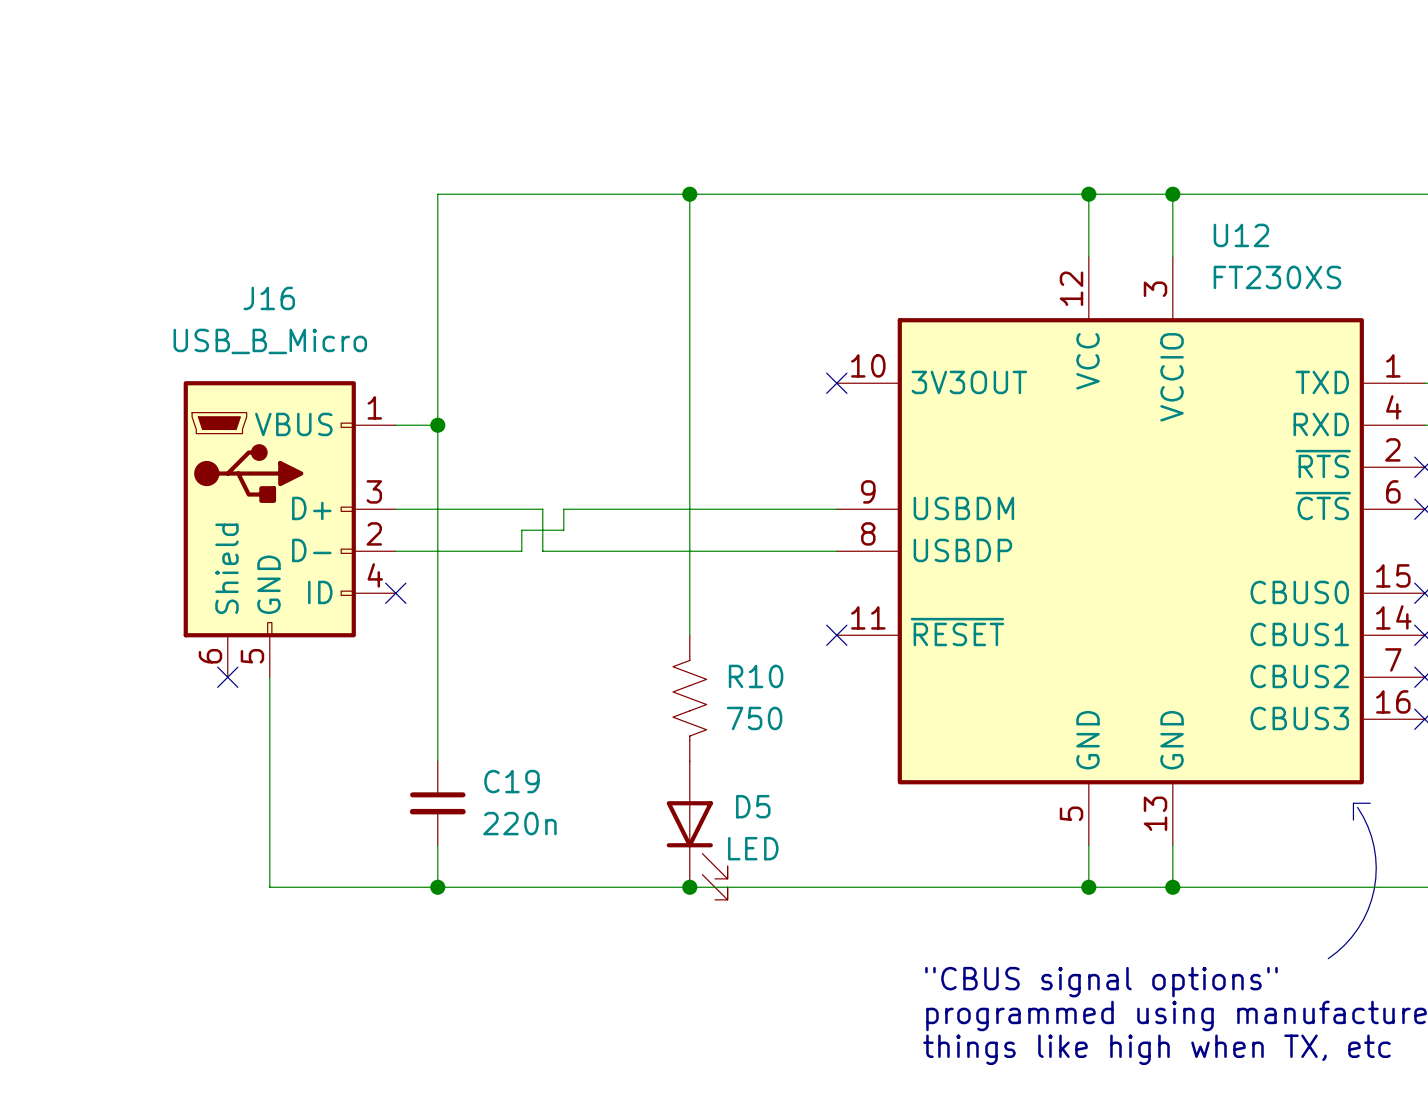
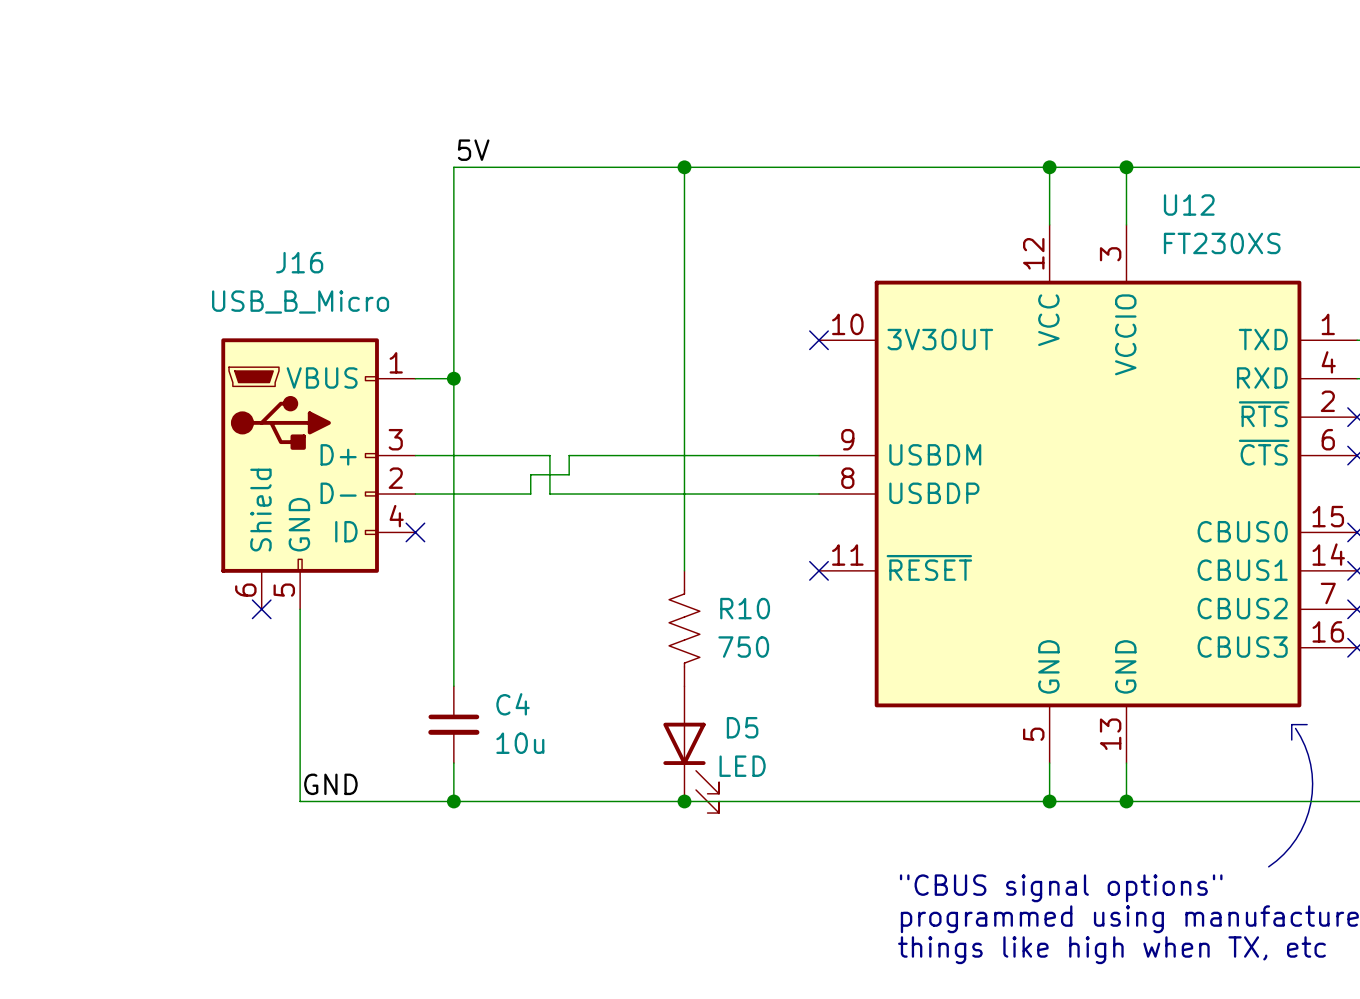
label: none -> 5V (473, 150)
C19 name: C19 (511, 781) -> C4 (513, 704)
C19 value: 220n (519, 823) -> 10u (520, 743)
label: none -> GND (330, 784)

